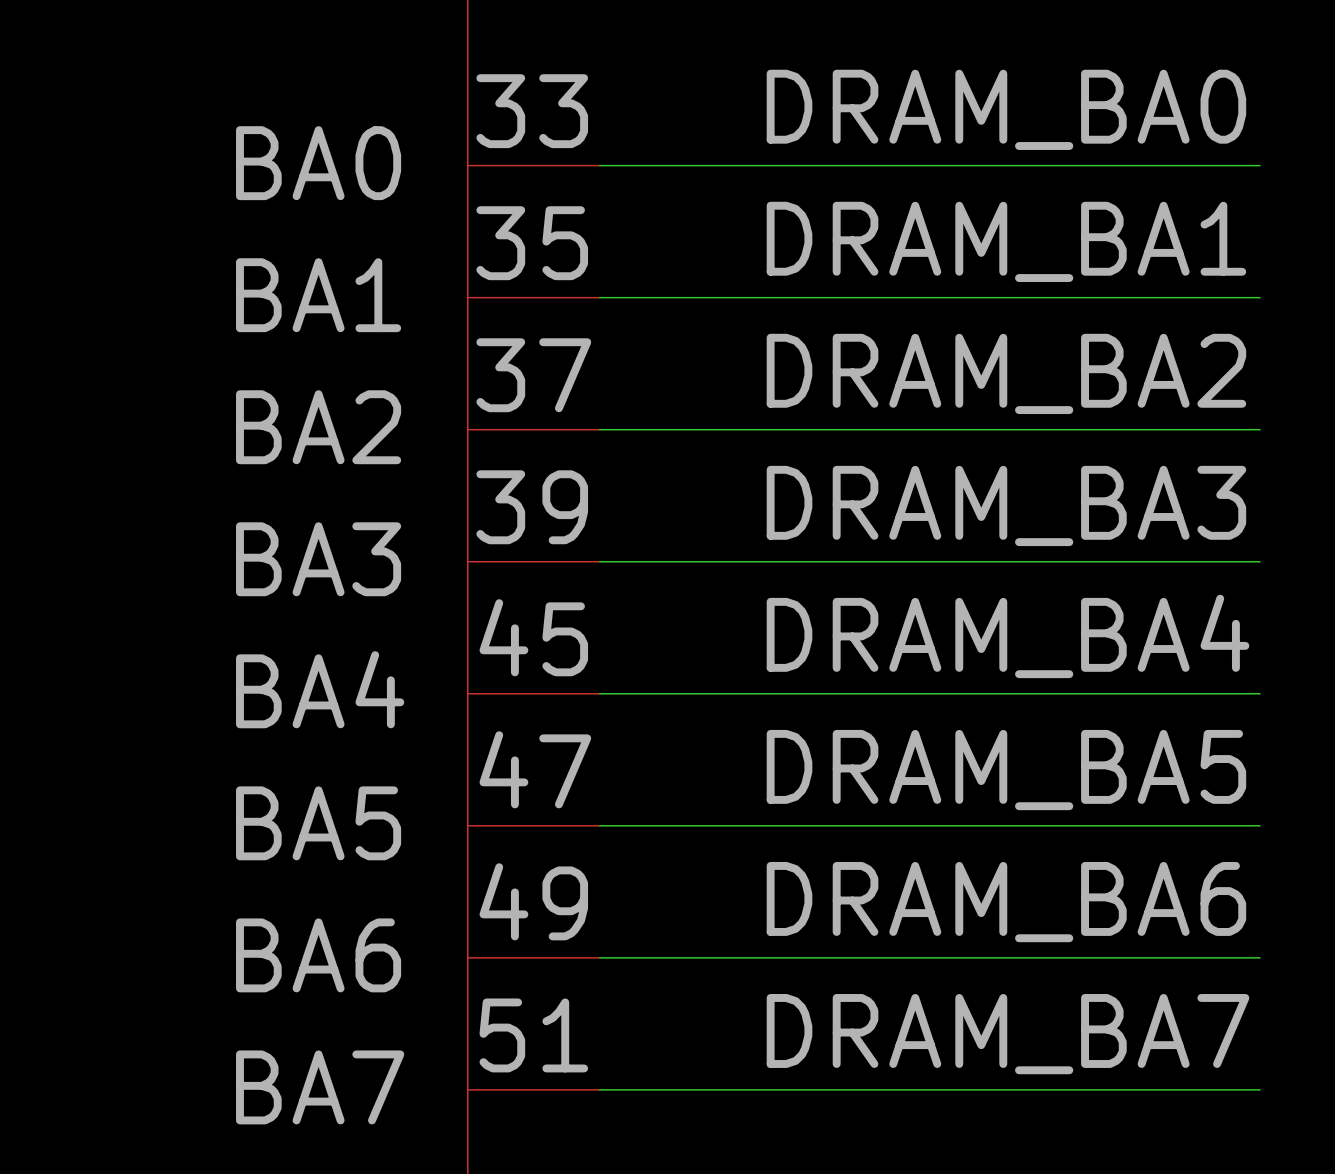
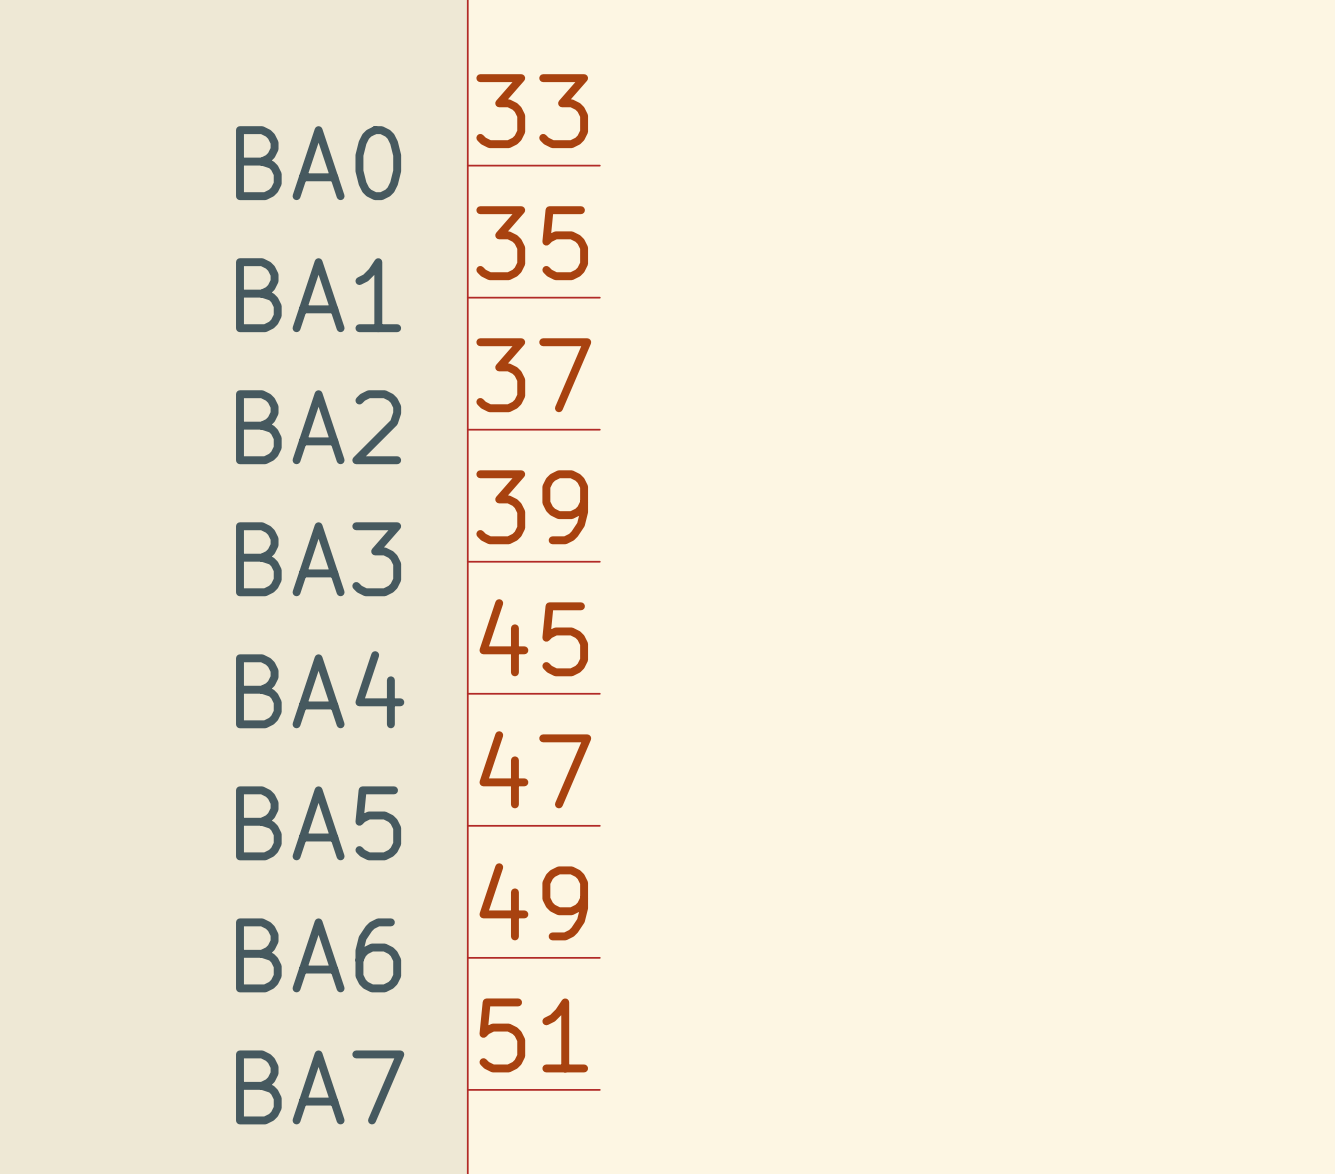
label: DRAM_BA0 (1006, 109) -> none
wire: (599, 165) (1260, 165) -> none
label: DRAM_BA1 (1006, 241) -> none
wire: (599, 297) (1260, 297) -> none
label: DRAM_BA2 (1006, 373) -> none
wire: (599, 429) (1260, 429) -> none
label: DRAM_BA3 (1006, 505) -> none
wire: (599, 561) (1260, 561) -> none
label: DRAM_BA4 (1008, 636) -> none
wire: (599, 693) (1260, 693) -> none
label: DRAM_BA5 (1006, 770) -> none
wire: (599, 825) (1260, 825) -> none
label: DRAM_BA6 (1006, 902) -> none
wire: (599, 957) (1260, 957) -> none
label: DRAM_BA7 (1008, 1034) -> none
wire: (599, 1089) (1260, 1089) -> none

